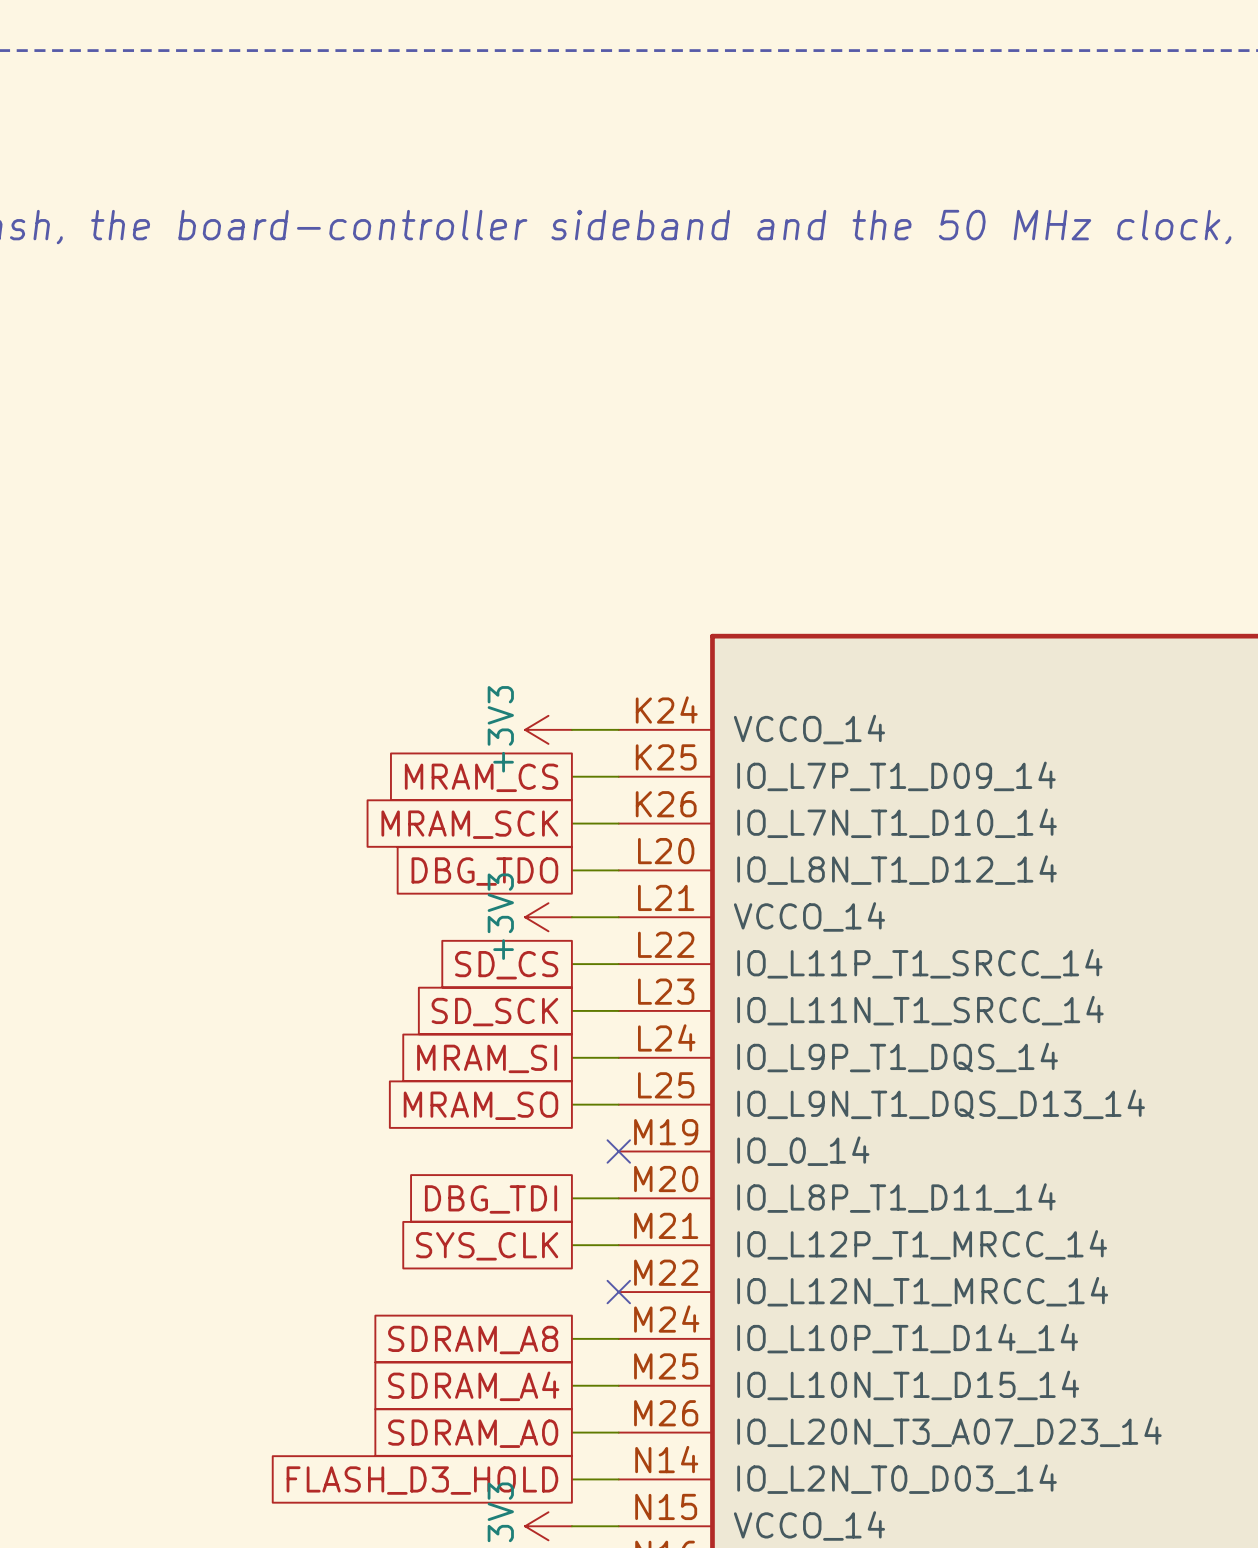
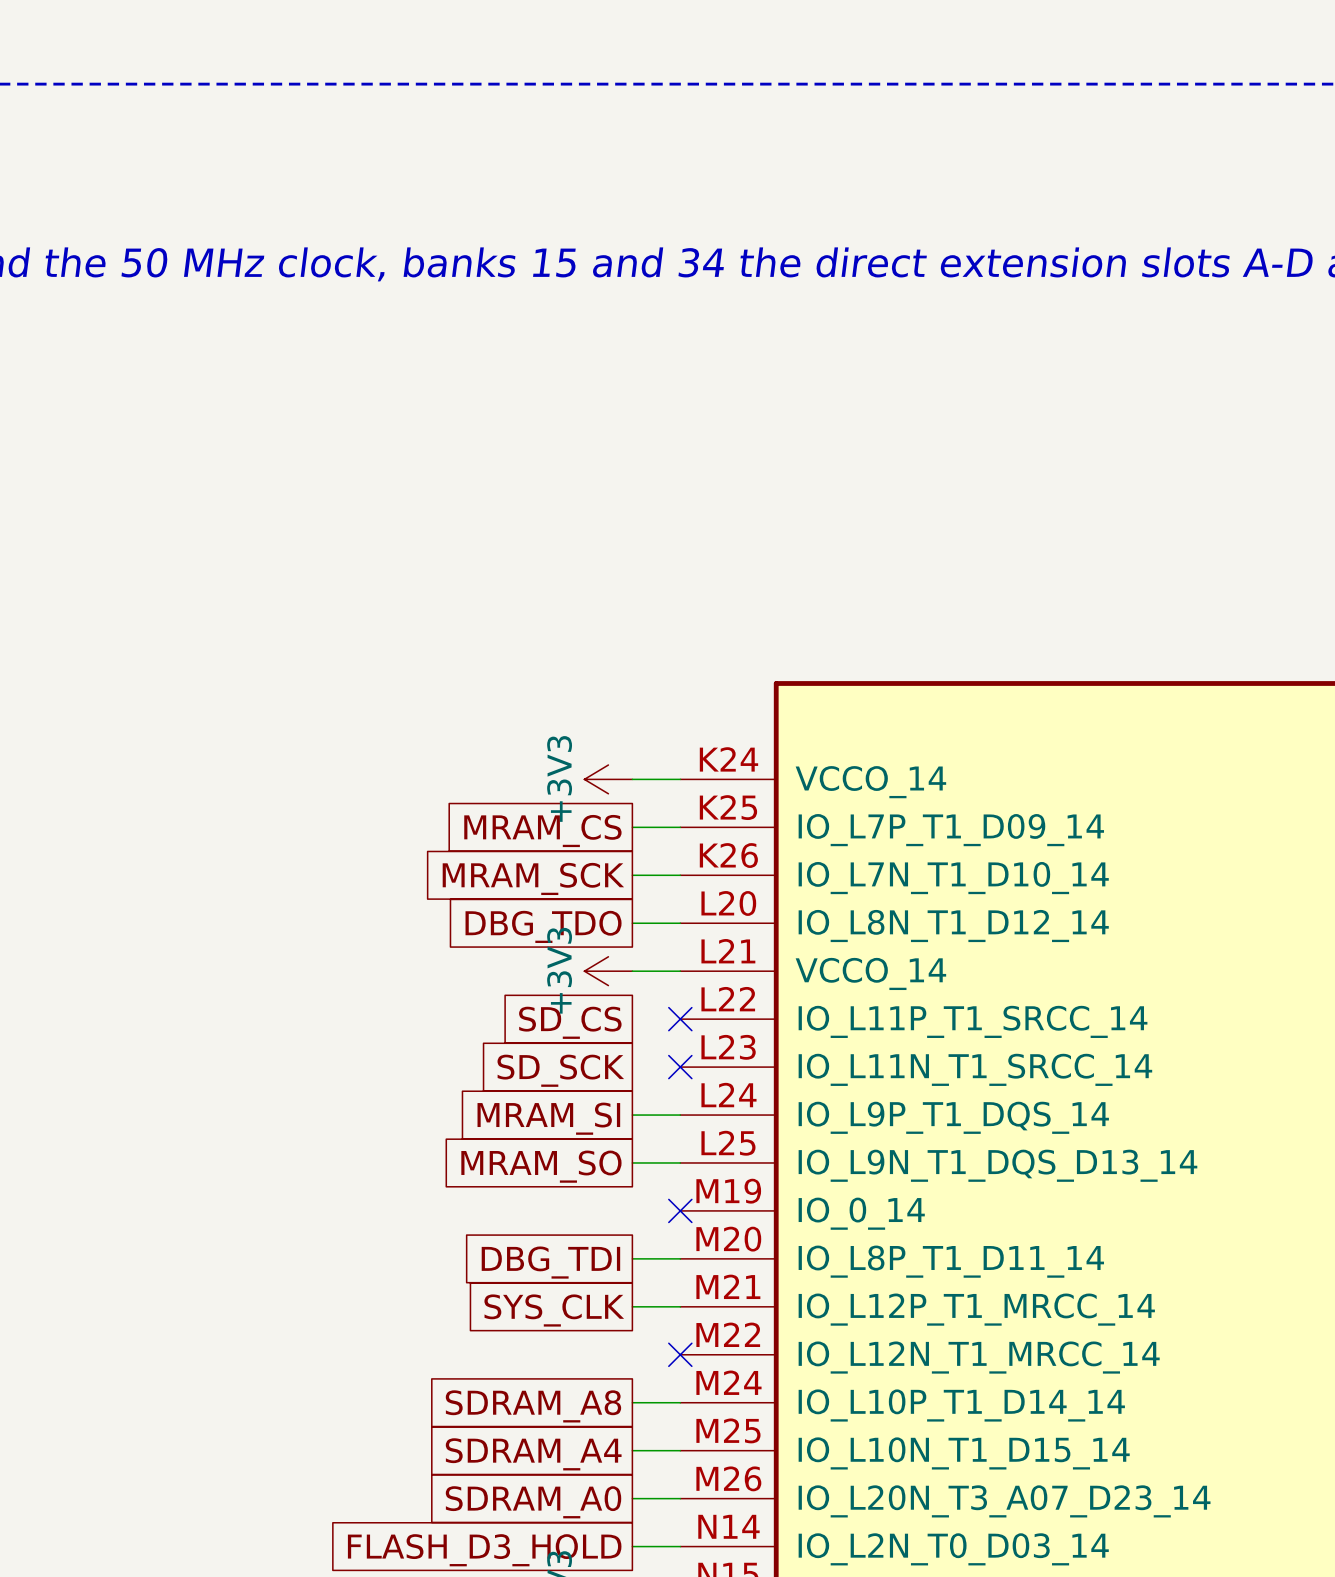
wire: (571, 964) (618, 964) -> none
no-connect mark: none -> (680, 1019)
wire: (571, 1010) (618, 1010) -> none
no-connect mark: none -> (680, 1067)

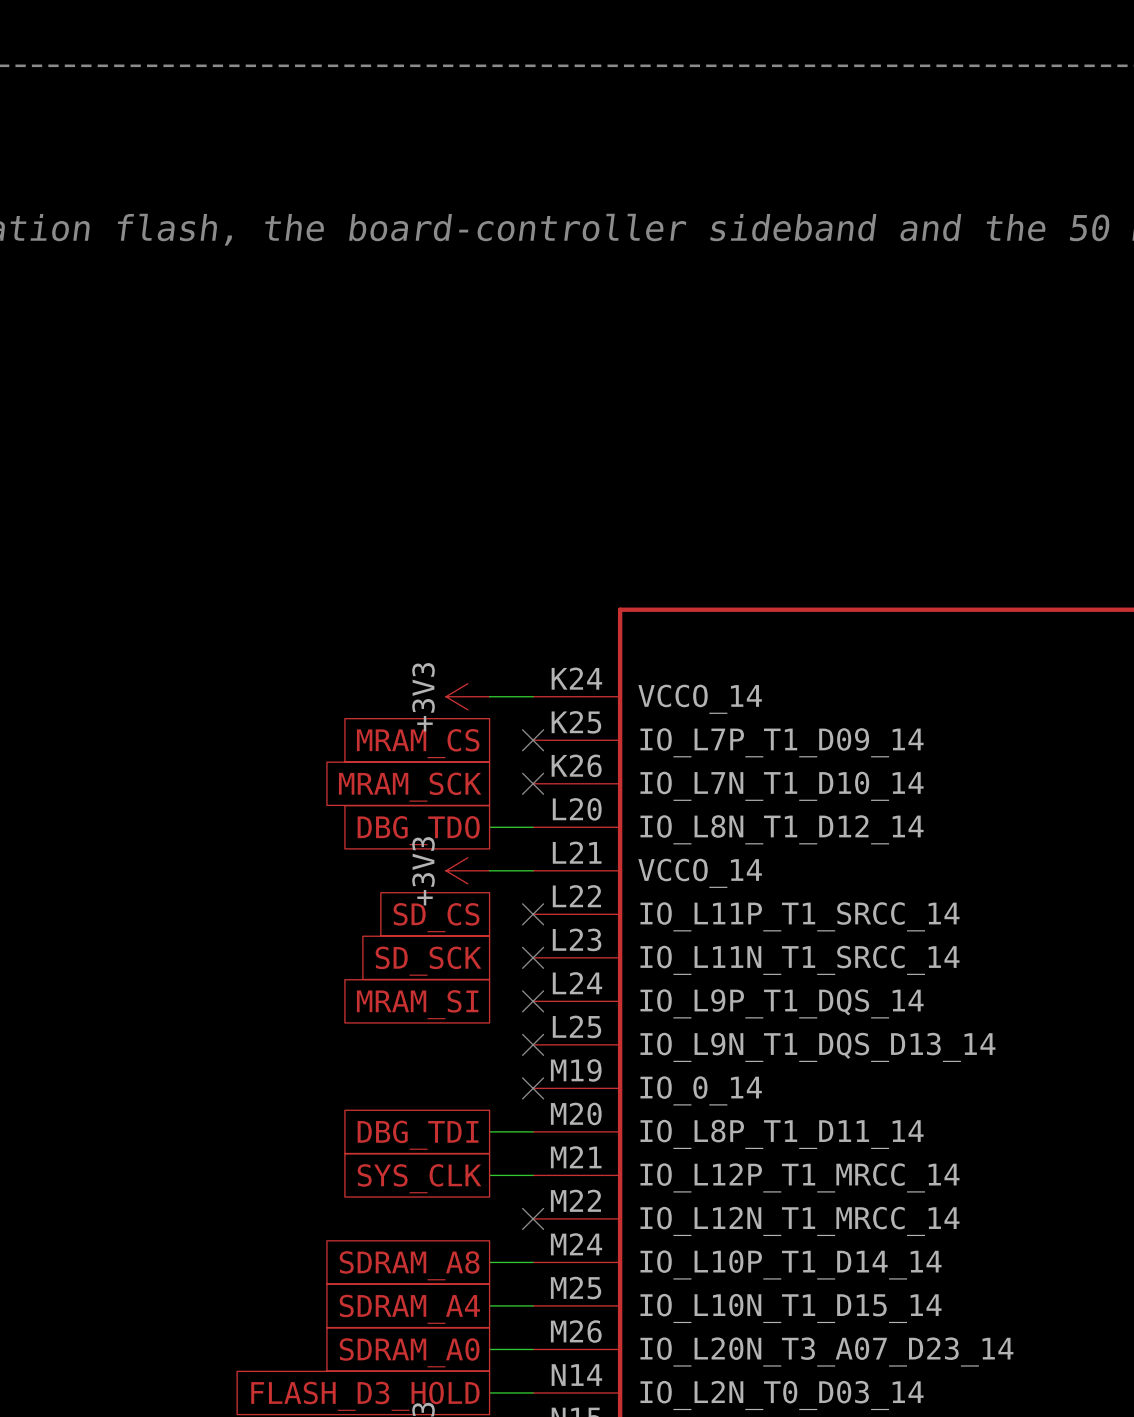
wire: (632, 827) (680, 827) -> none
no-connect mark: none -> (533, 740)
wire: (632, 875) (680, 875) -> none
no-connect mark: none -> (533, 783)
wire: (632, 1115) (680, 1115) -> none
no-connect mark: none -> (533, 1001)
wire: (632, 1162) (680, 1162) -> none
no-connect mark: none -> (533, 1044)
global label: MRAM_SO (541, 1166) -> none

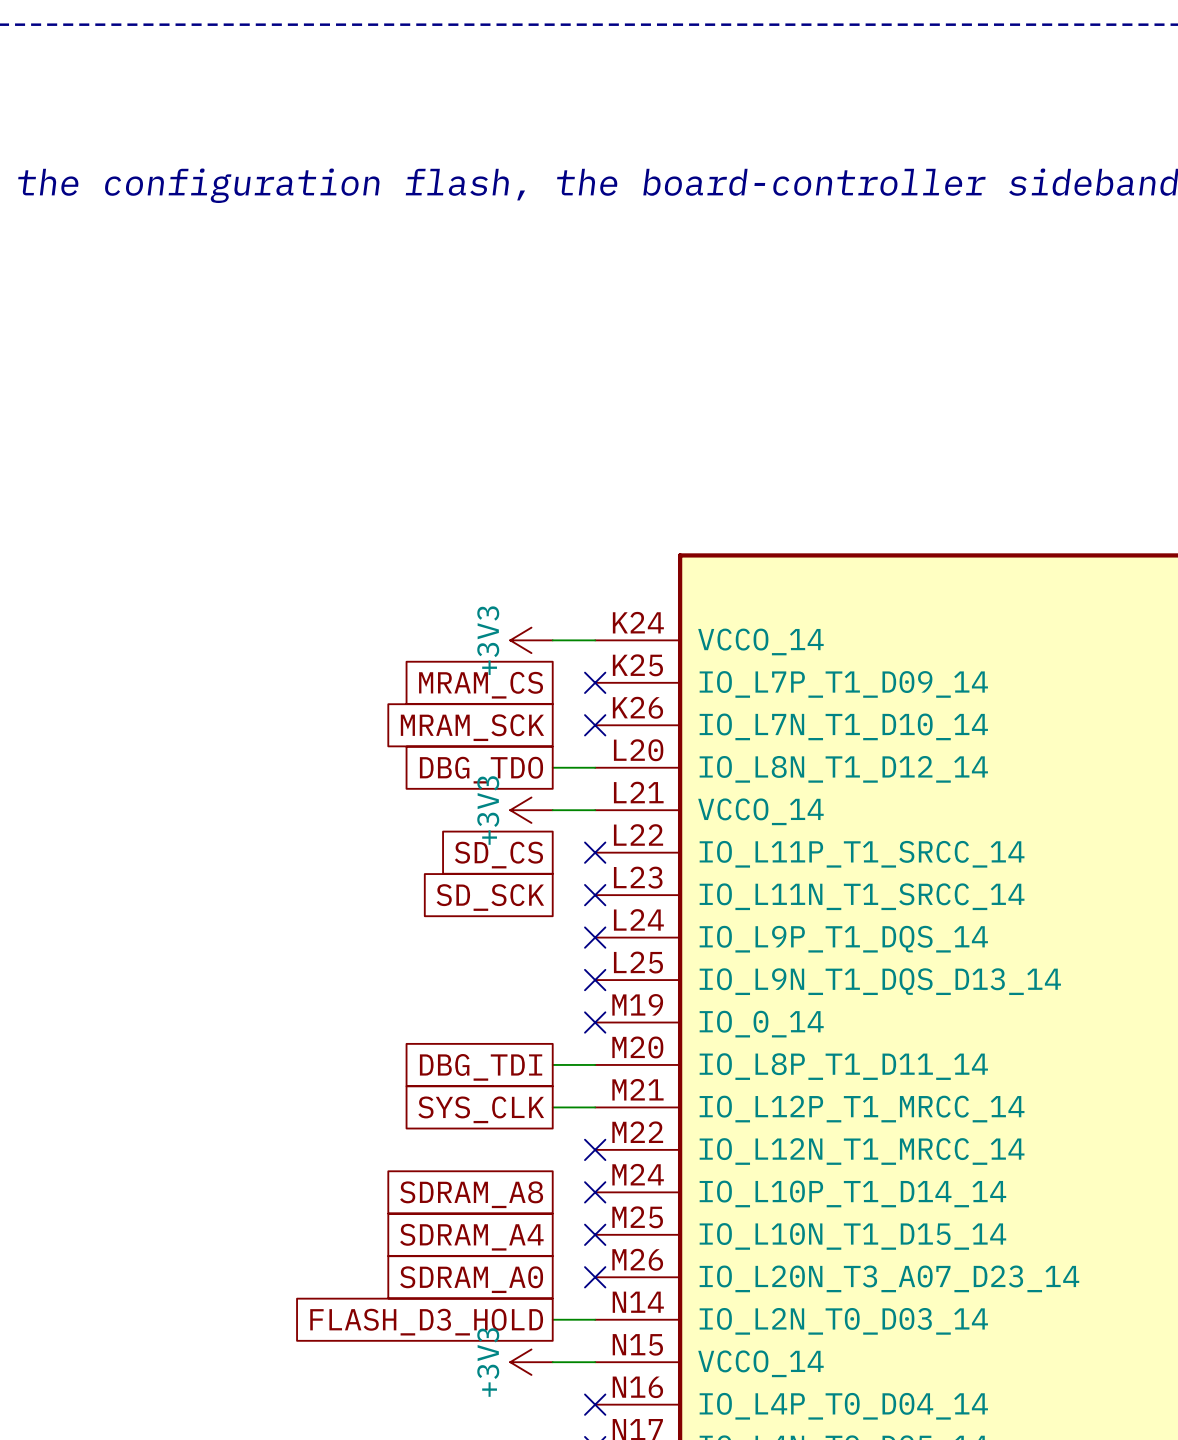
global label: MRAM_SI (417, 1004) -> none
wire: (489, 1262) (533, 1262) -> none
no-connect mark: none -> (595, 1192)
wire: (489, 1305) (533, 1305) -> none
no-connect mark: none -> (595, 1234)
wire: (489, 1349) (533, 1349) -> none
no-connect mark: none -> (595, 1277)

